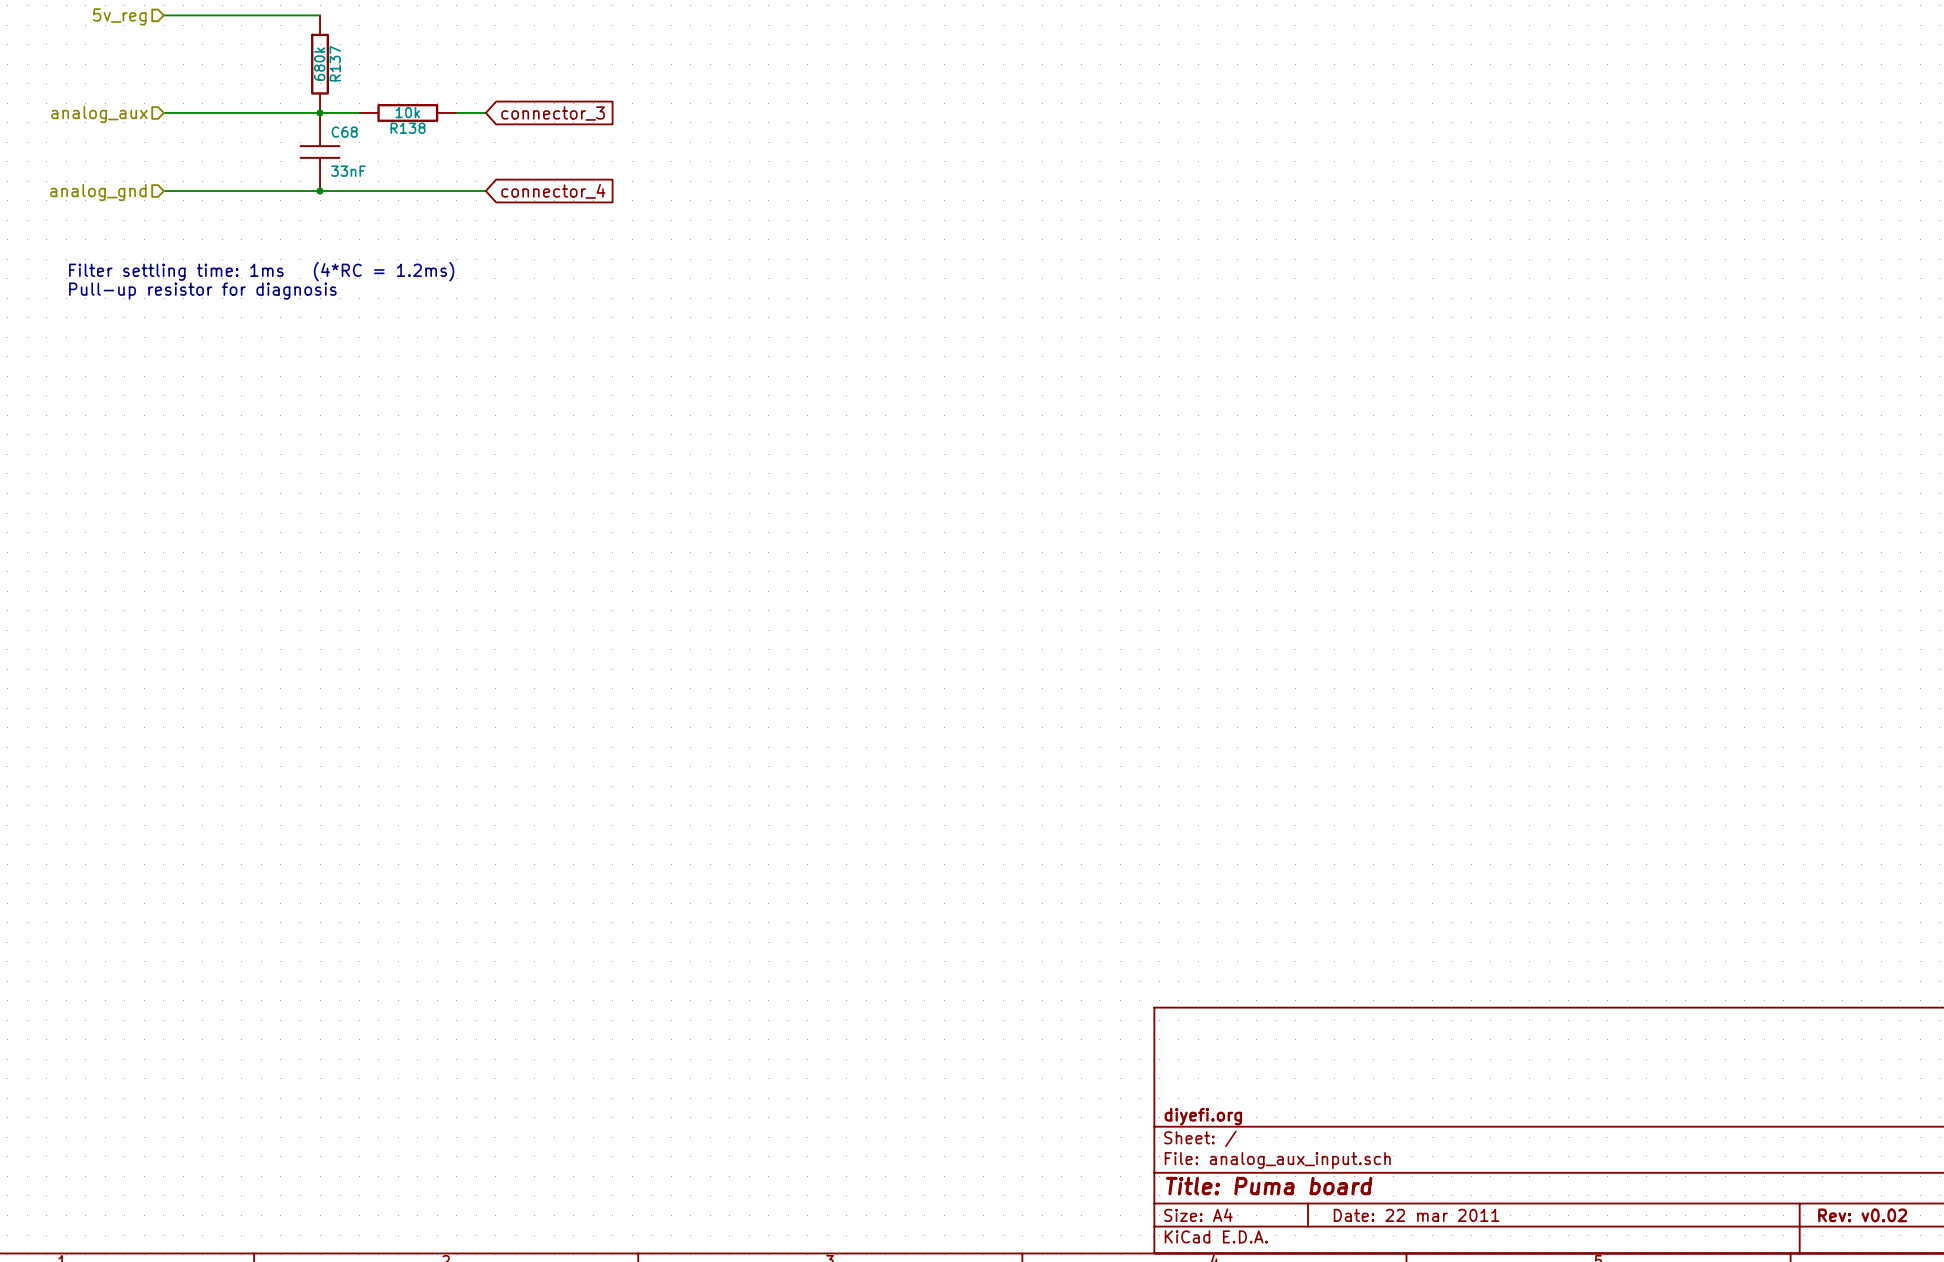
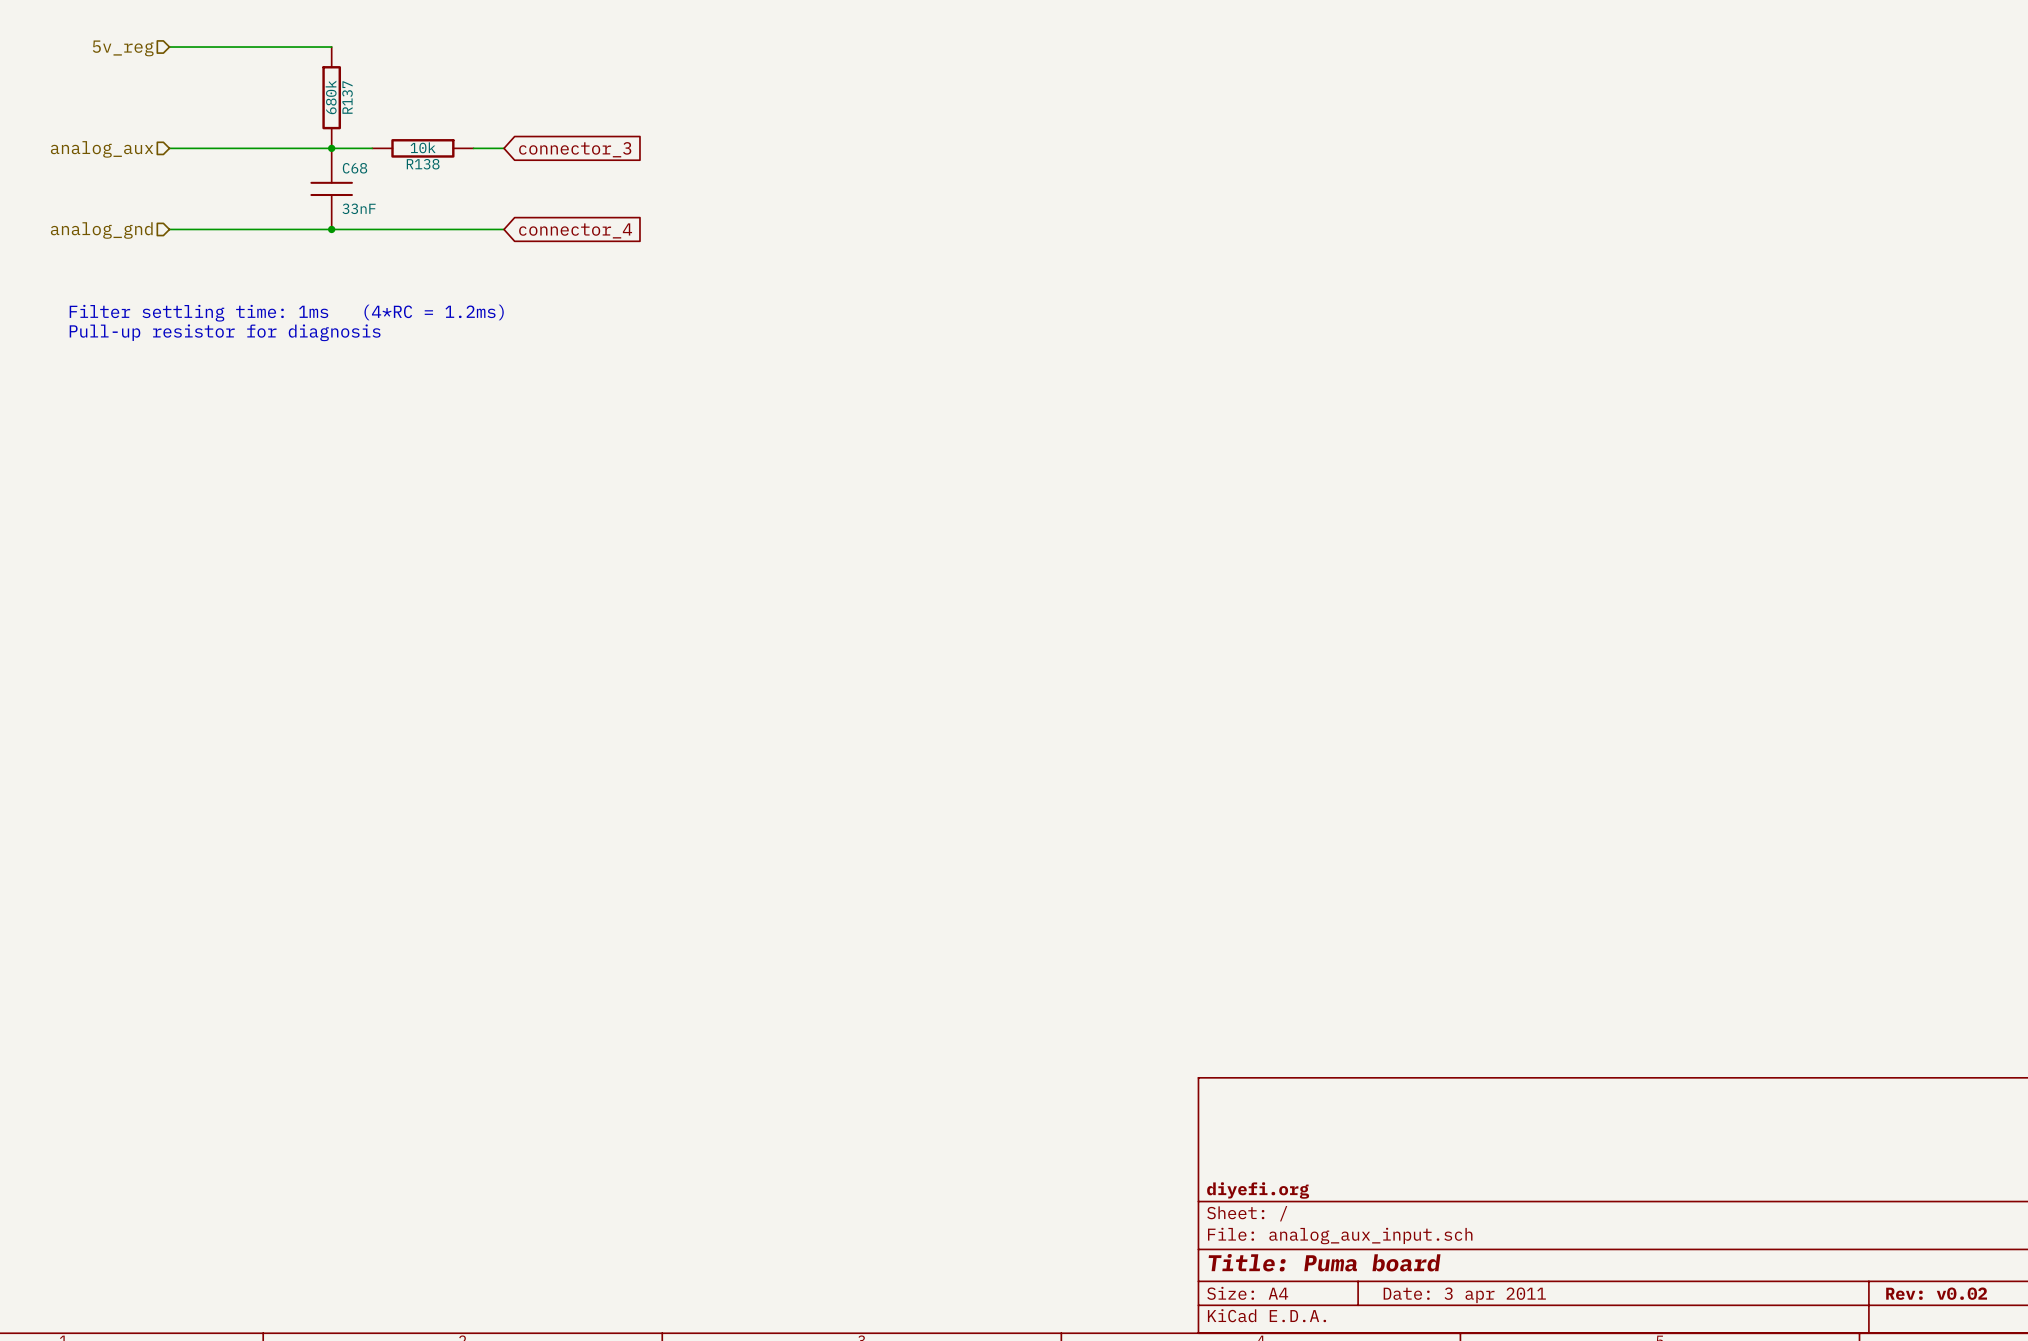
title block: Date: 22 mar 2011 (1416, 1215) -> Date: 3 apr 2011 (1464, 1295)

